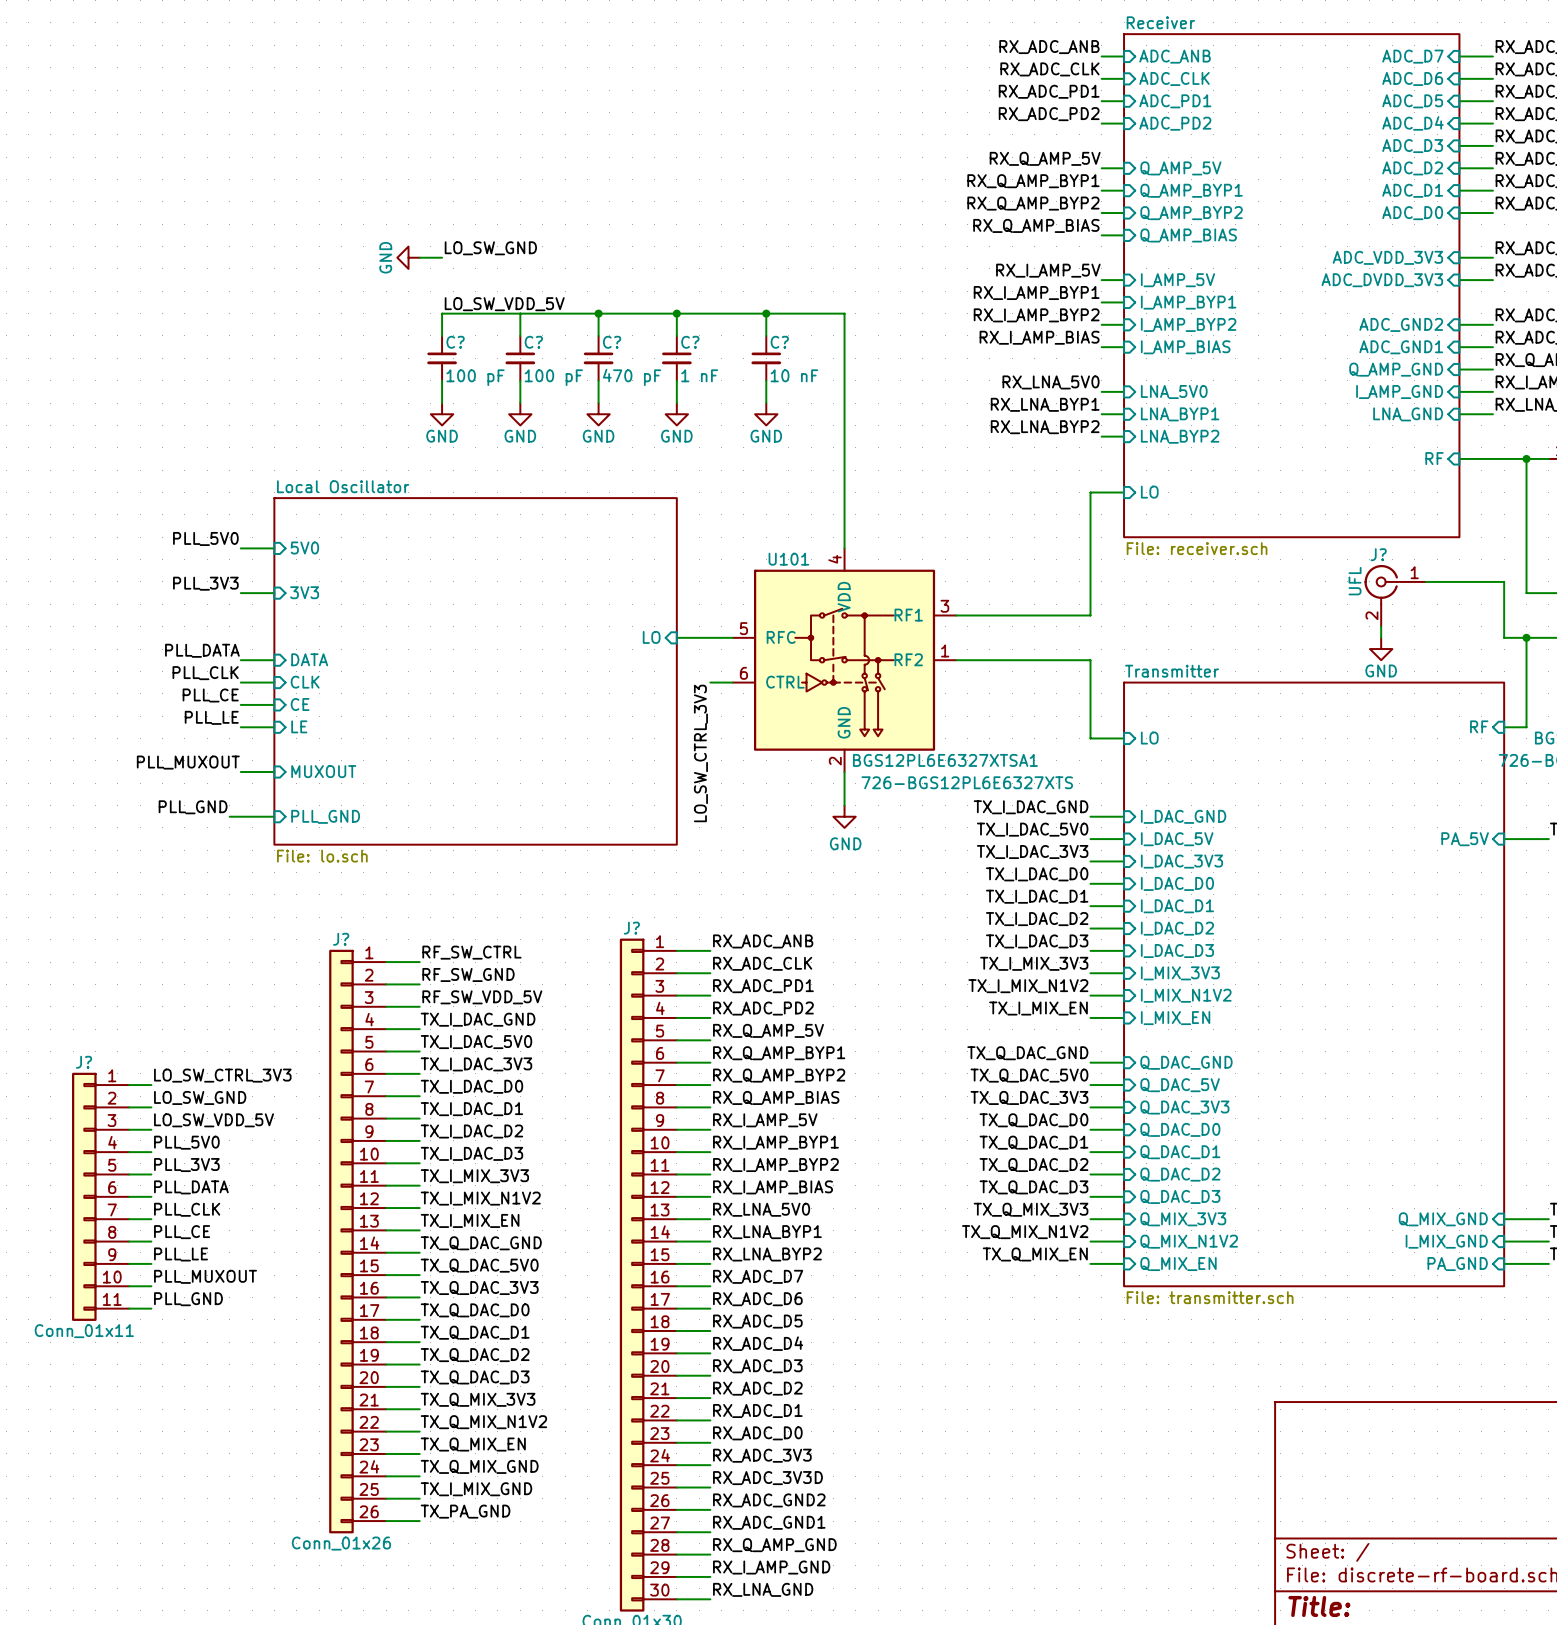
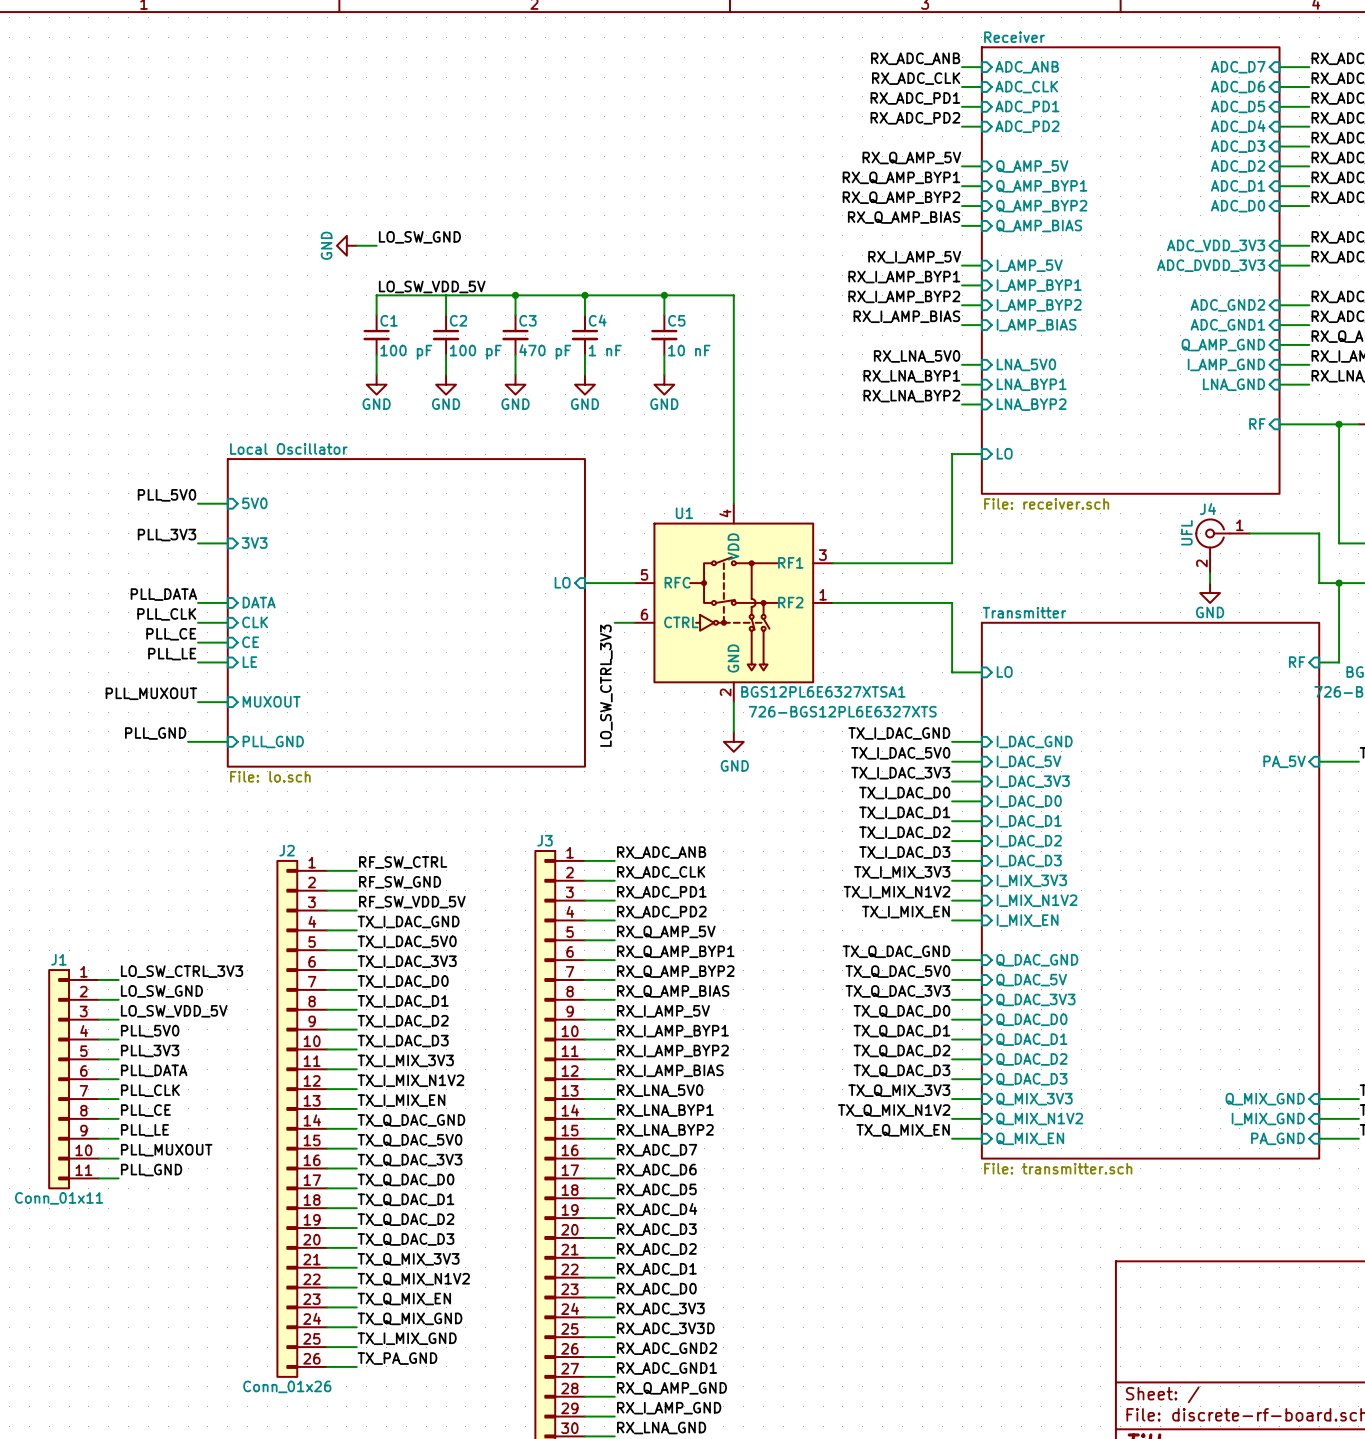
C? name: C? (455, 342) -> C1 (389, 320)
C? name: C? (533, 342) -> C2 (458, 320)
C? name: C? (612, 342) -> C3 (527, 320)
C? name: C? (690, 342) -> C4 (597, 320)
C? name: C? (779, 342) -> C5 (676, 320)
J? name: J? (1378, 554) -> J4 (1208, 509)
U101 name: U101 (788, 559) -> U1 (684, 513)
J? name: J? (631, 928) -> J3 (545, 840)
J? name: J? (341, 939) -> J2 (287, 850)
J? name: J? (84, 1062) -> J1 (58, 959)

